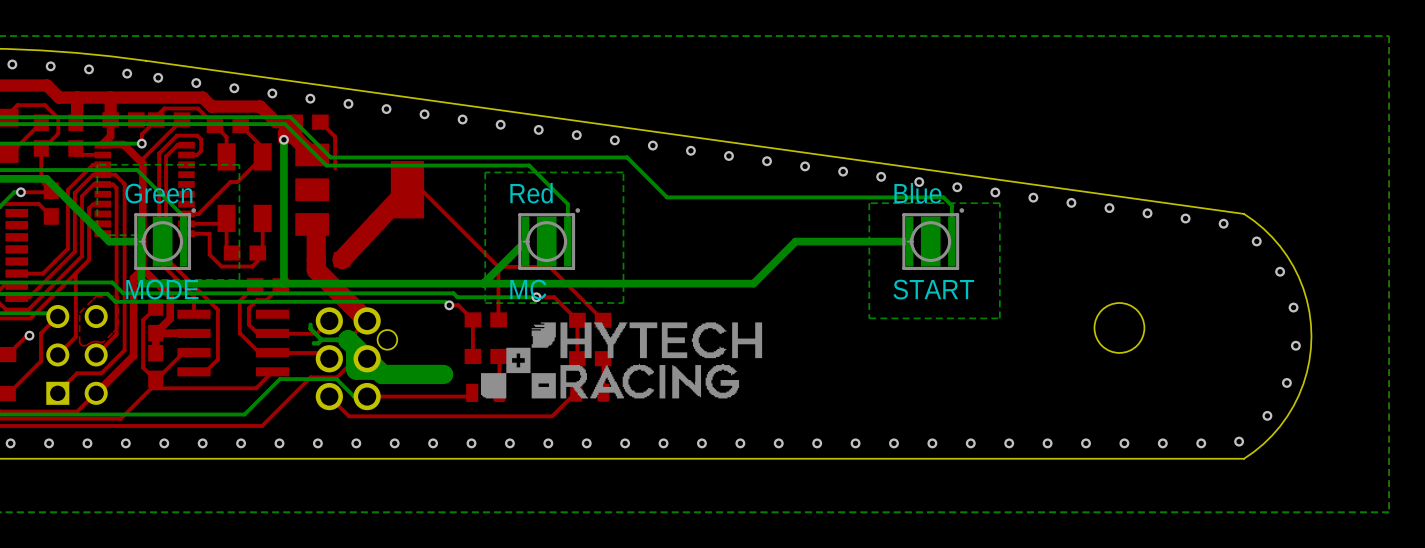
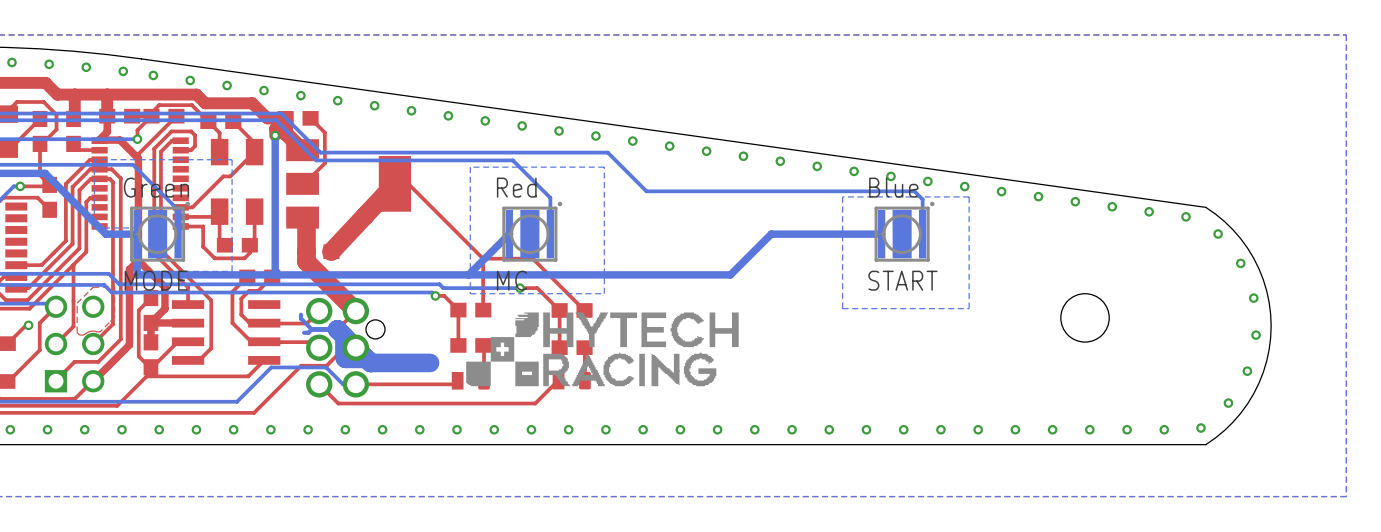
top track: none -> (324, 163) (304, 183)

